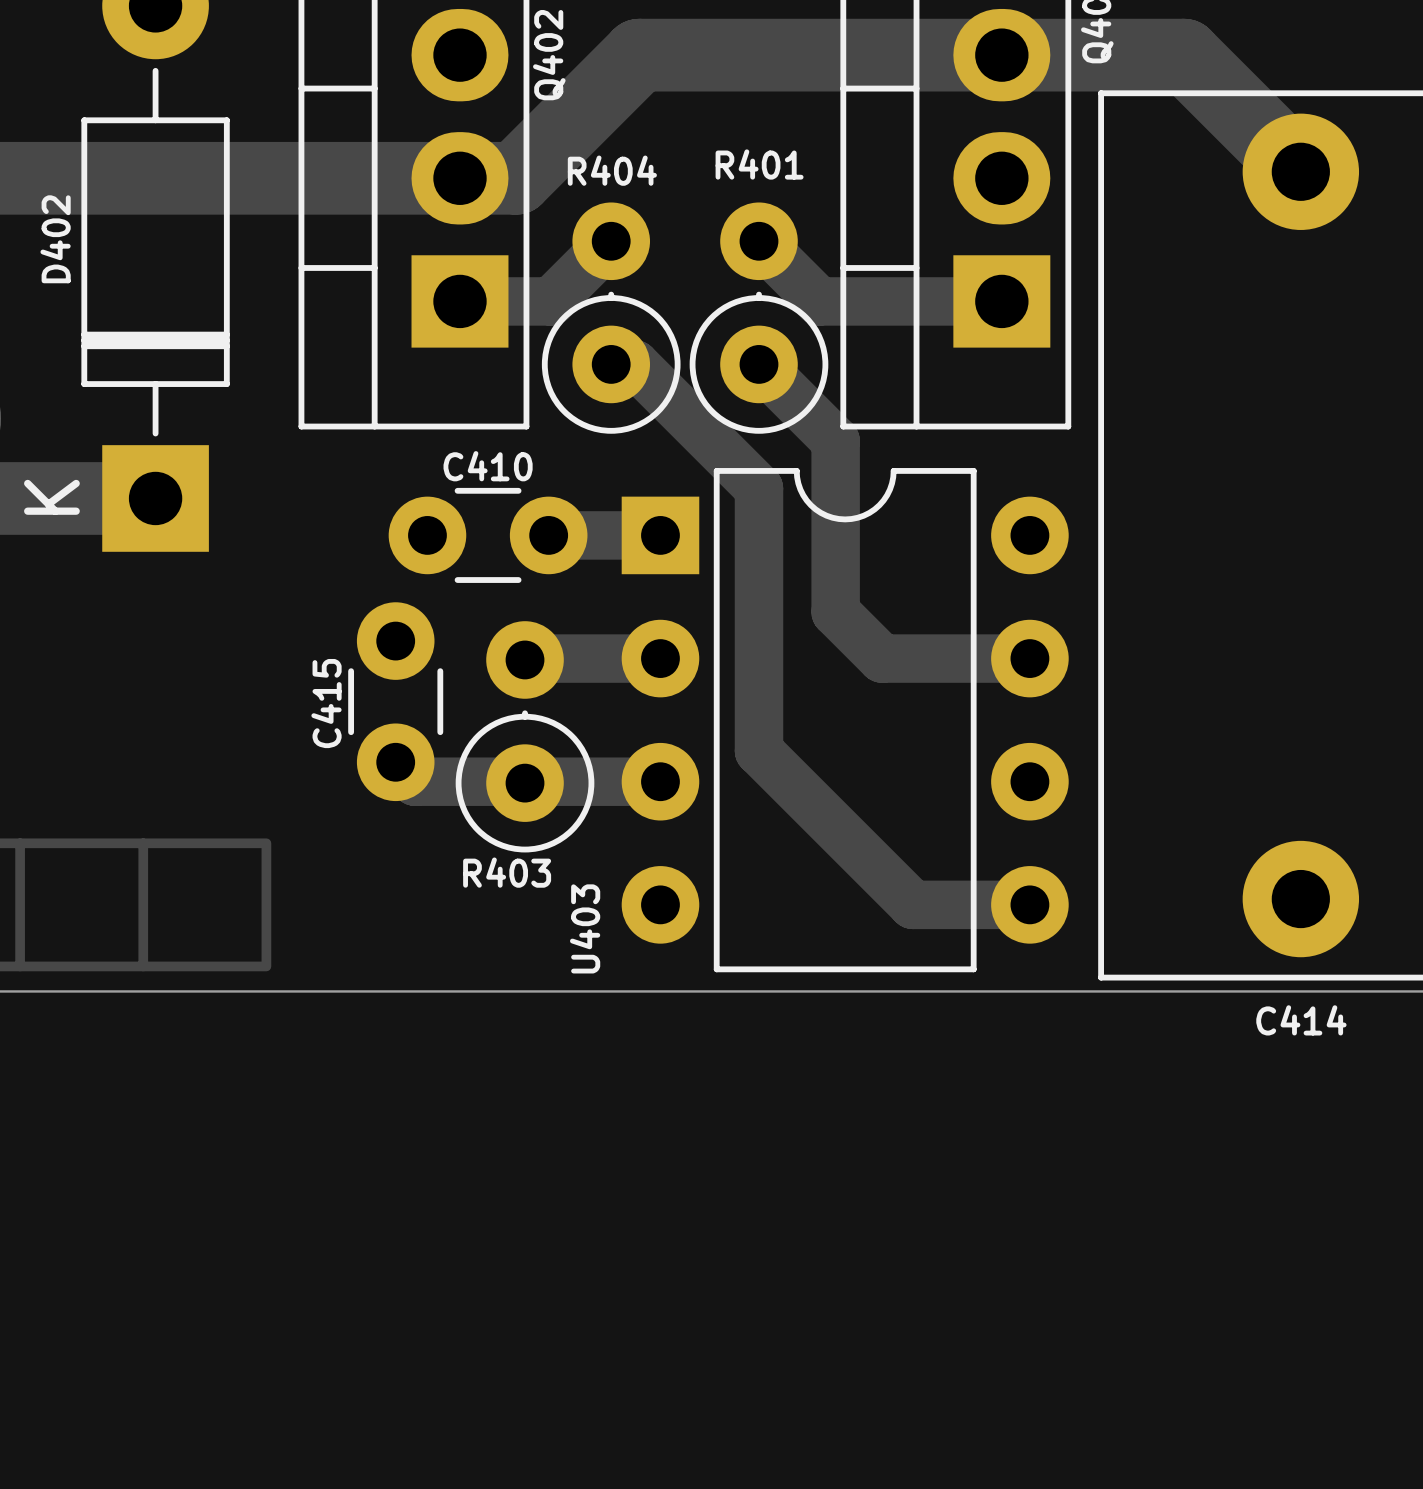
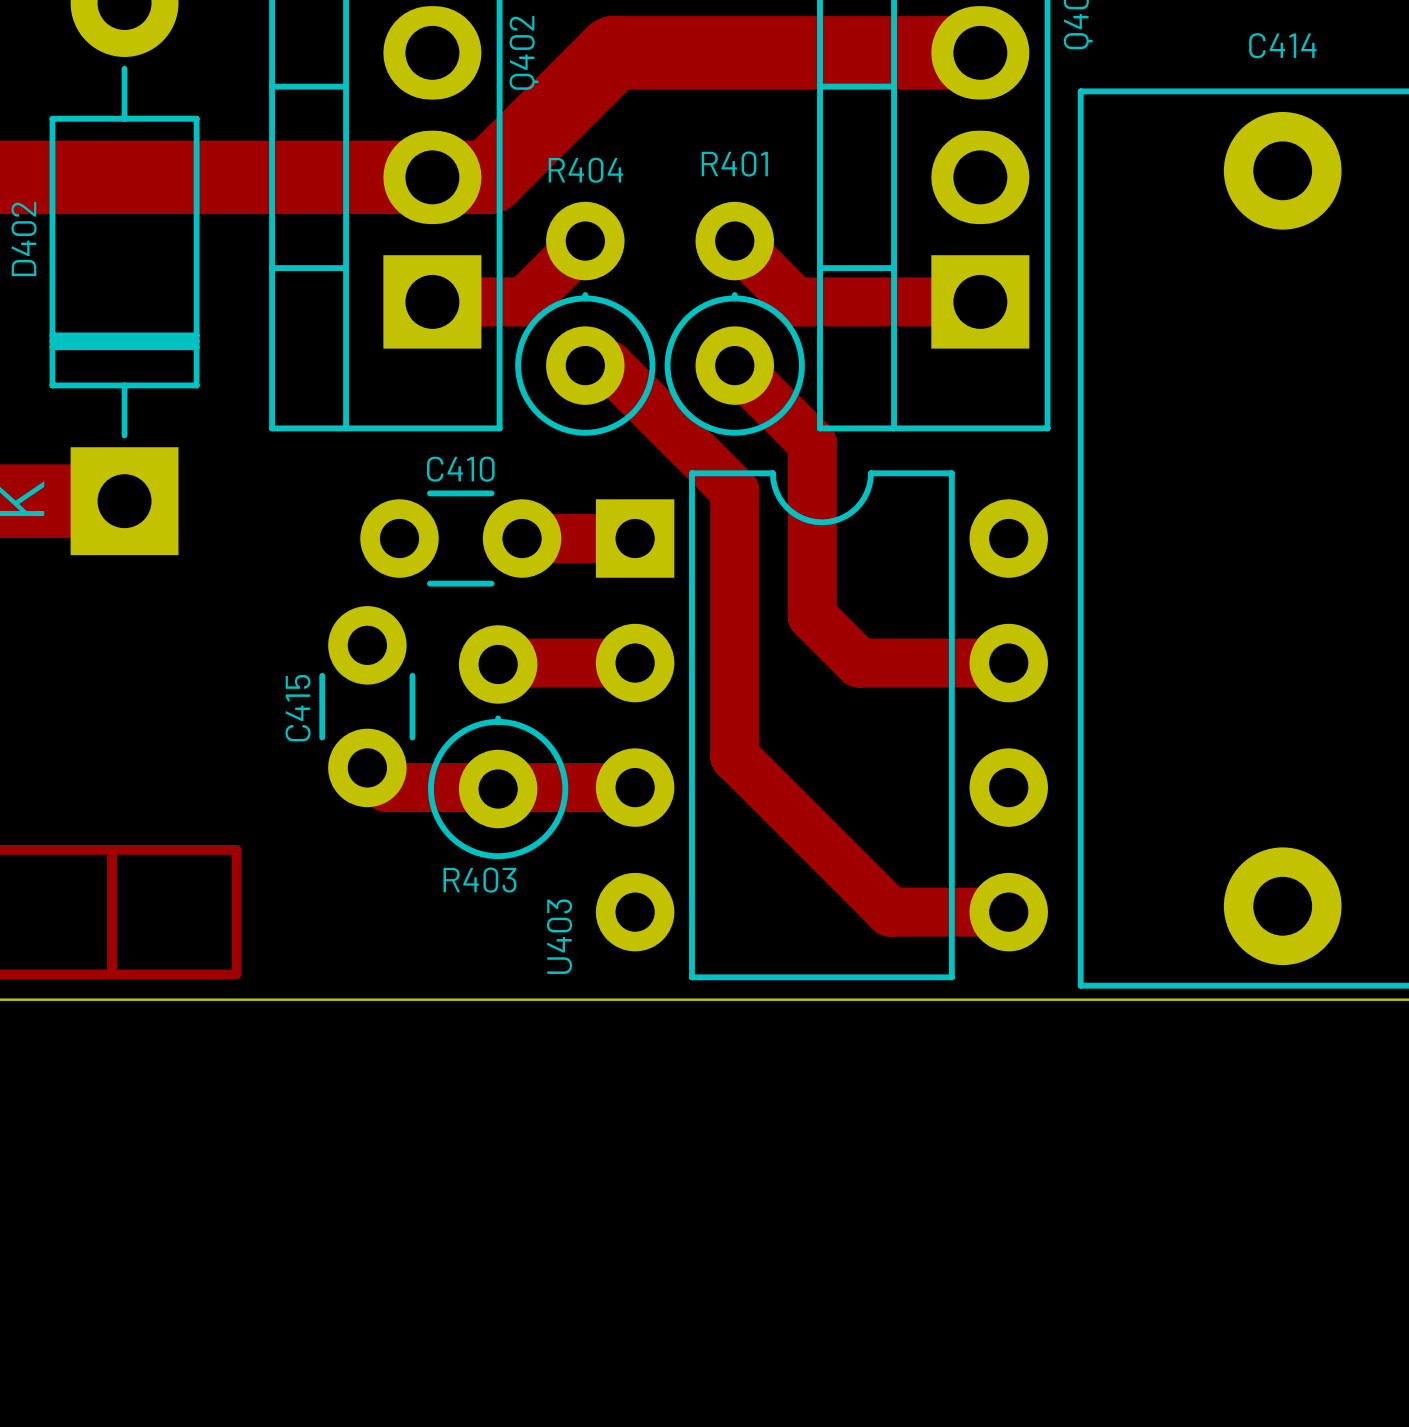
track: (1001, 55) (1184, 55) (1300, 171) -> none
C414 name position: C414 (1301, 1020) -> C414 (1282, 45)

